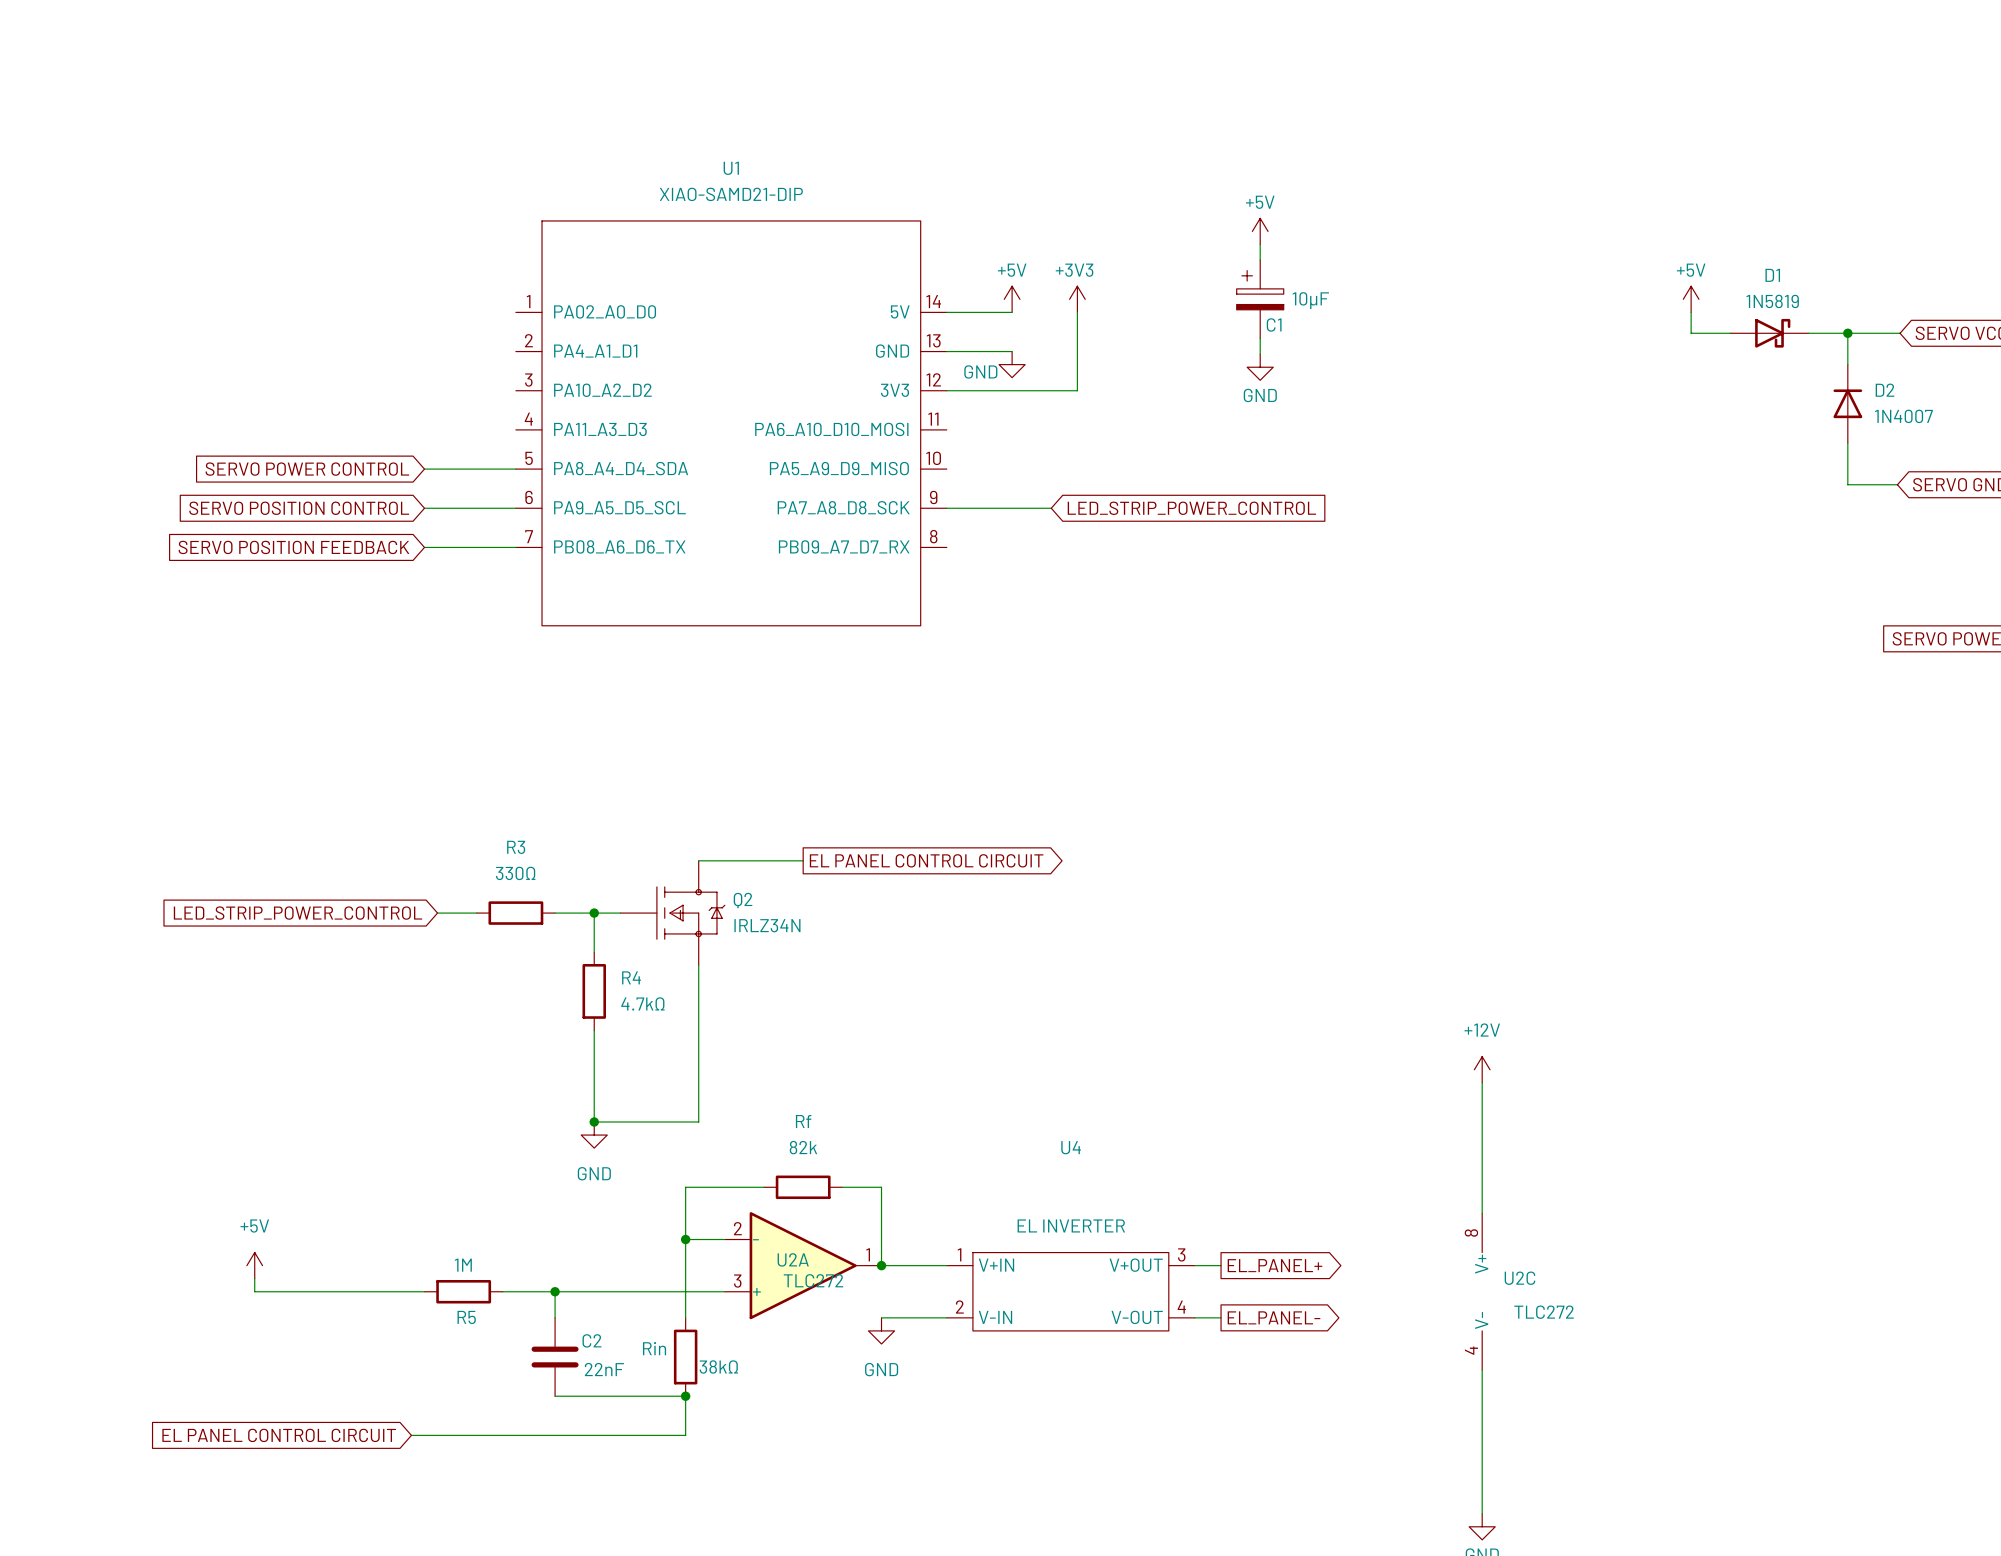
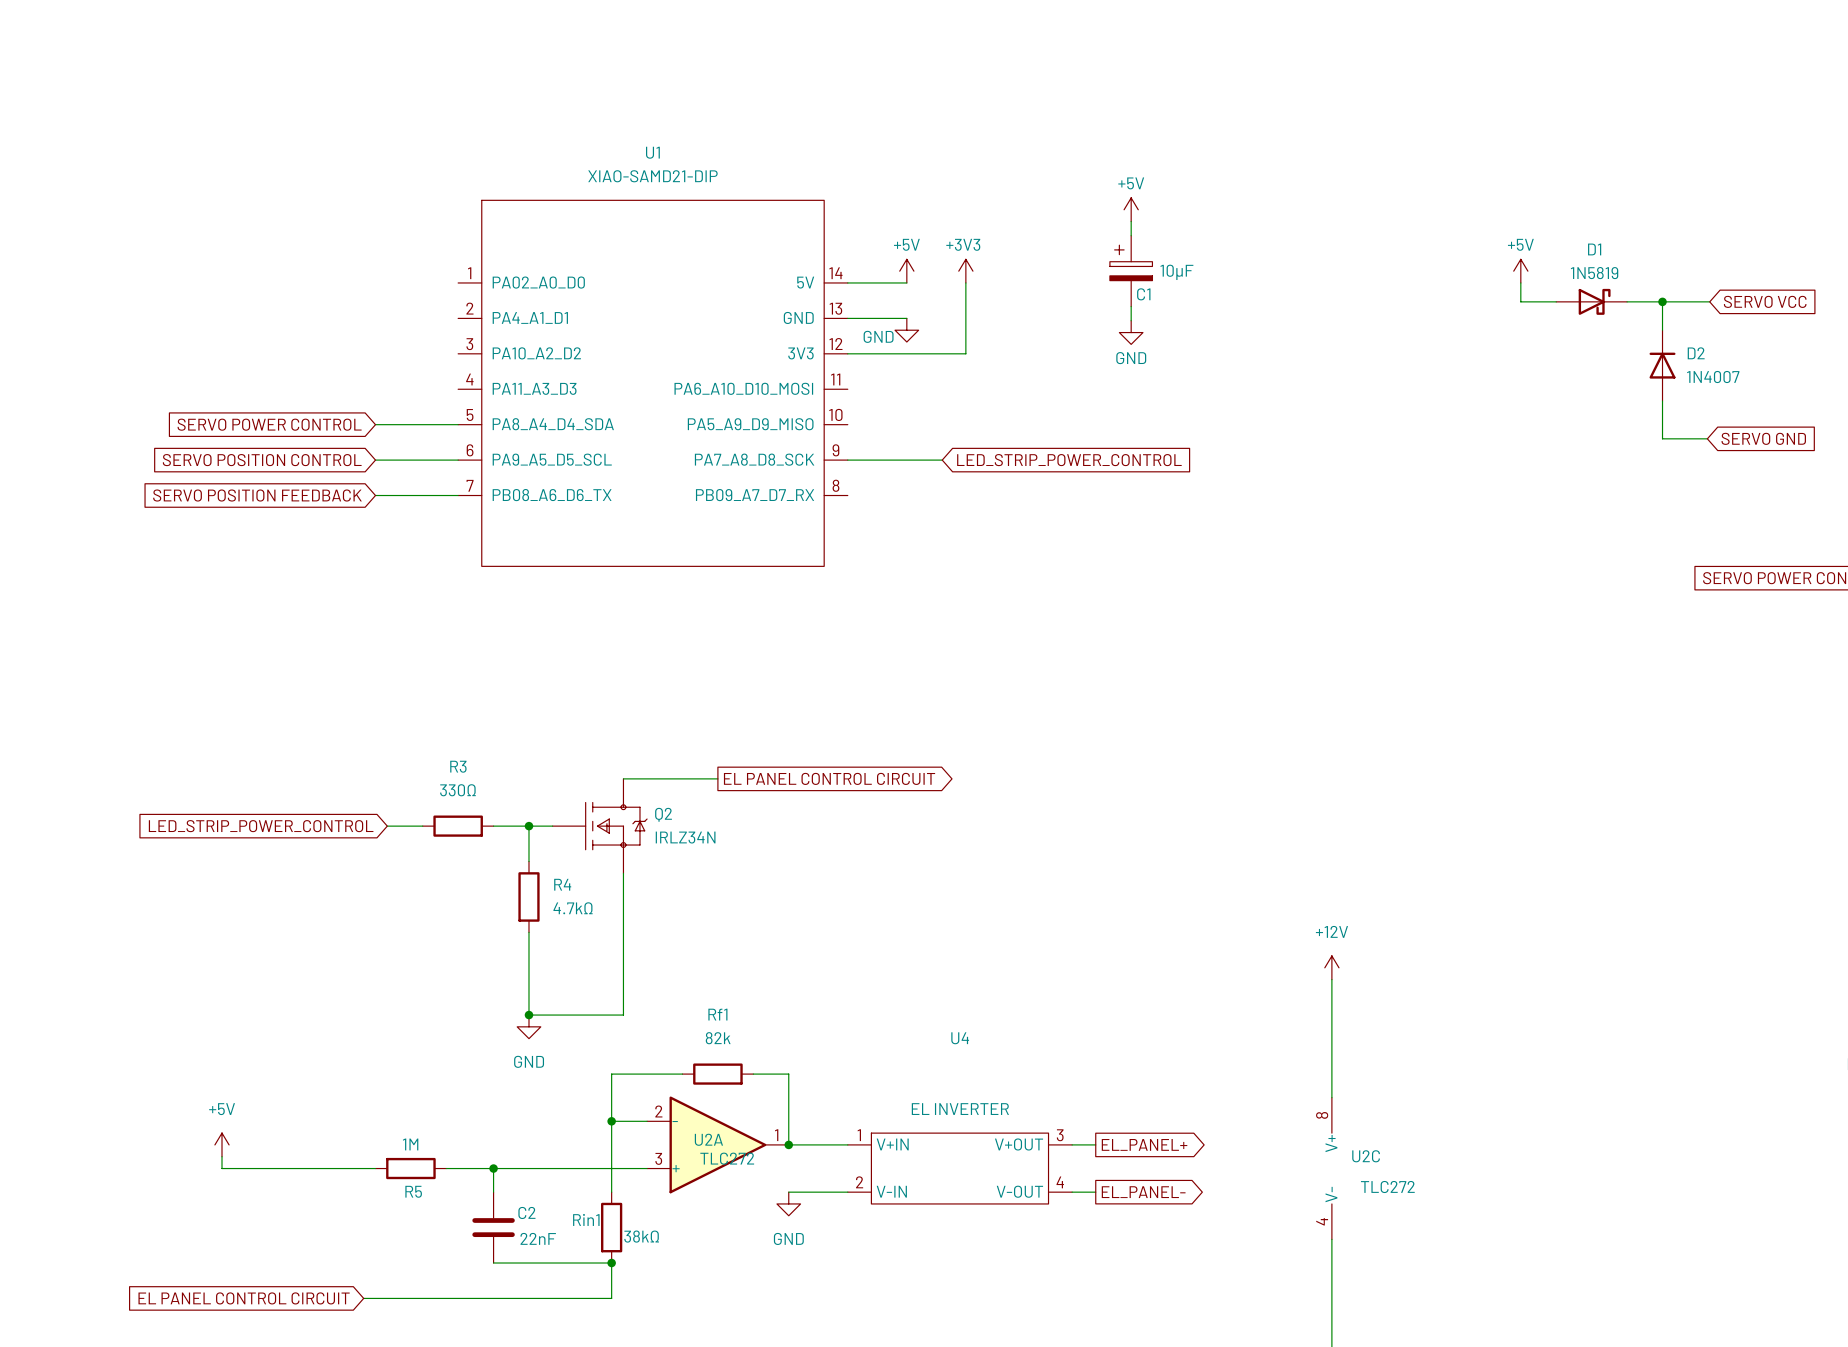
Rf name: Rf (803, 1121) -> Rf1 (717, 1014)
Rin name: Rin (654, 1348) -> Rin1 (586, 1219)

